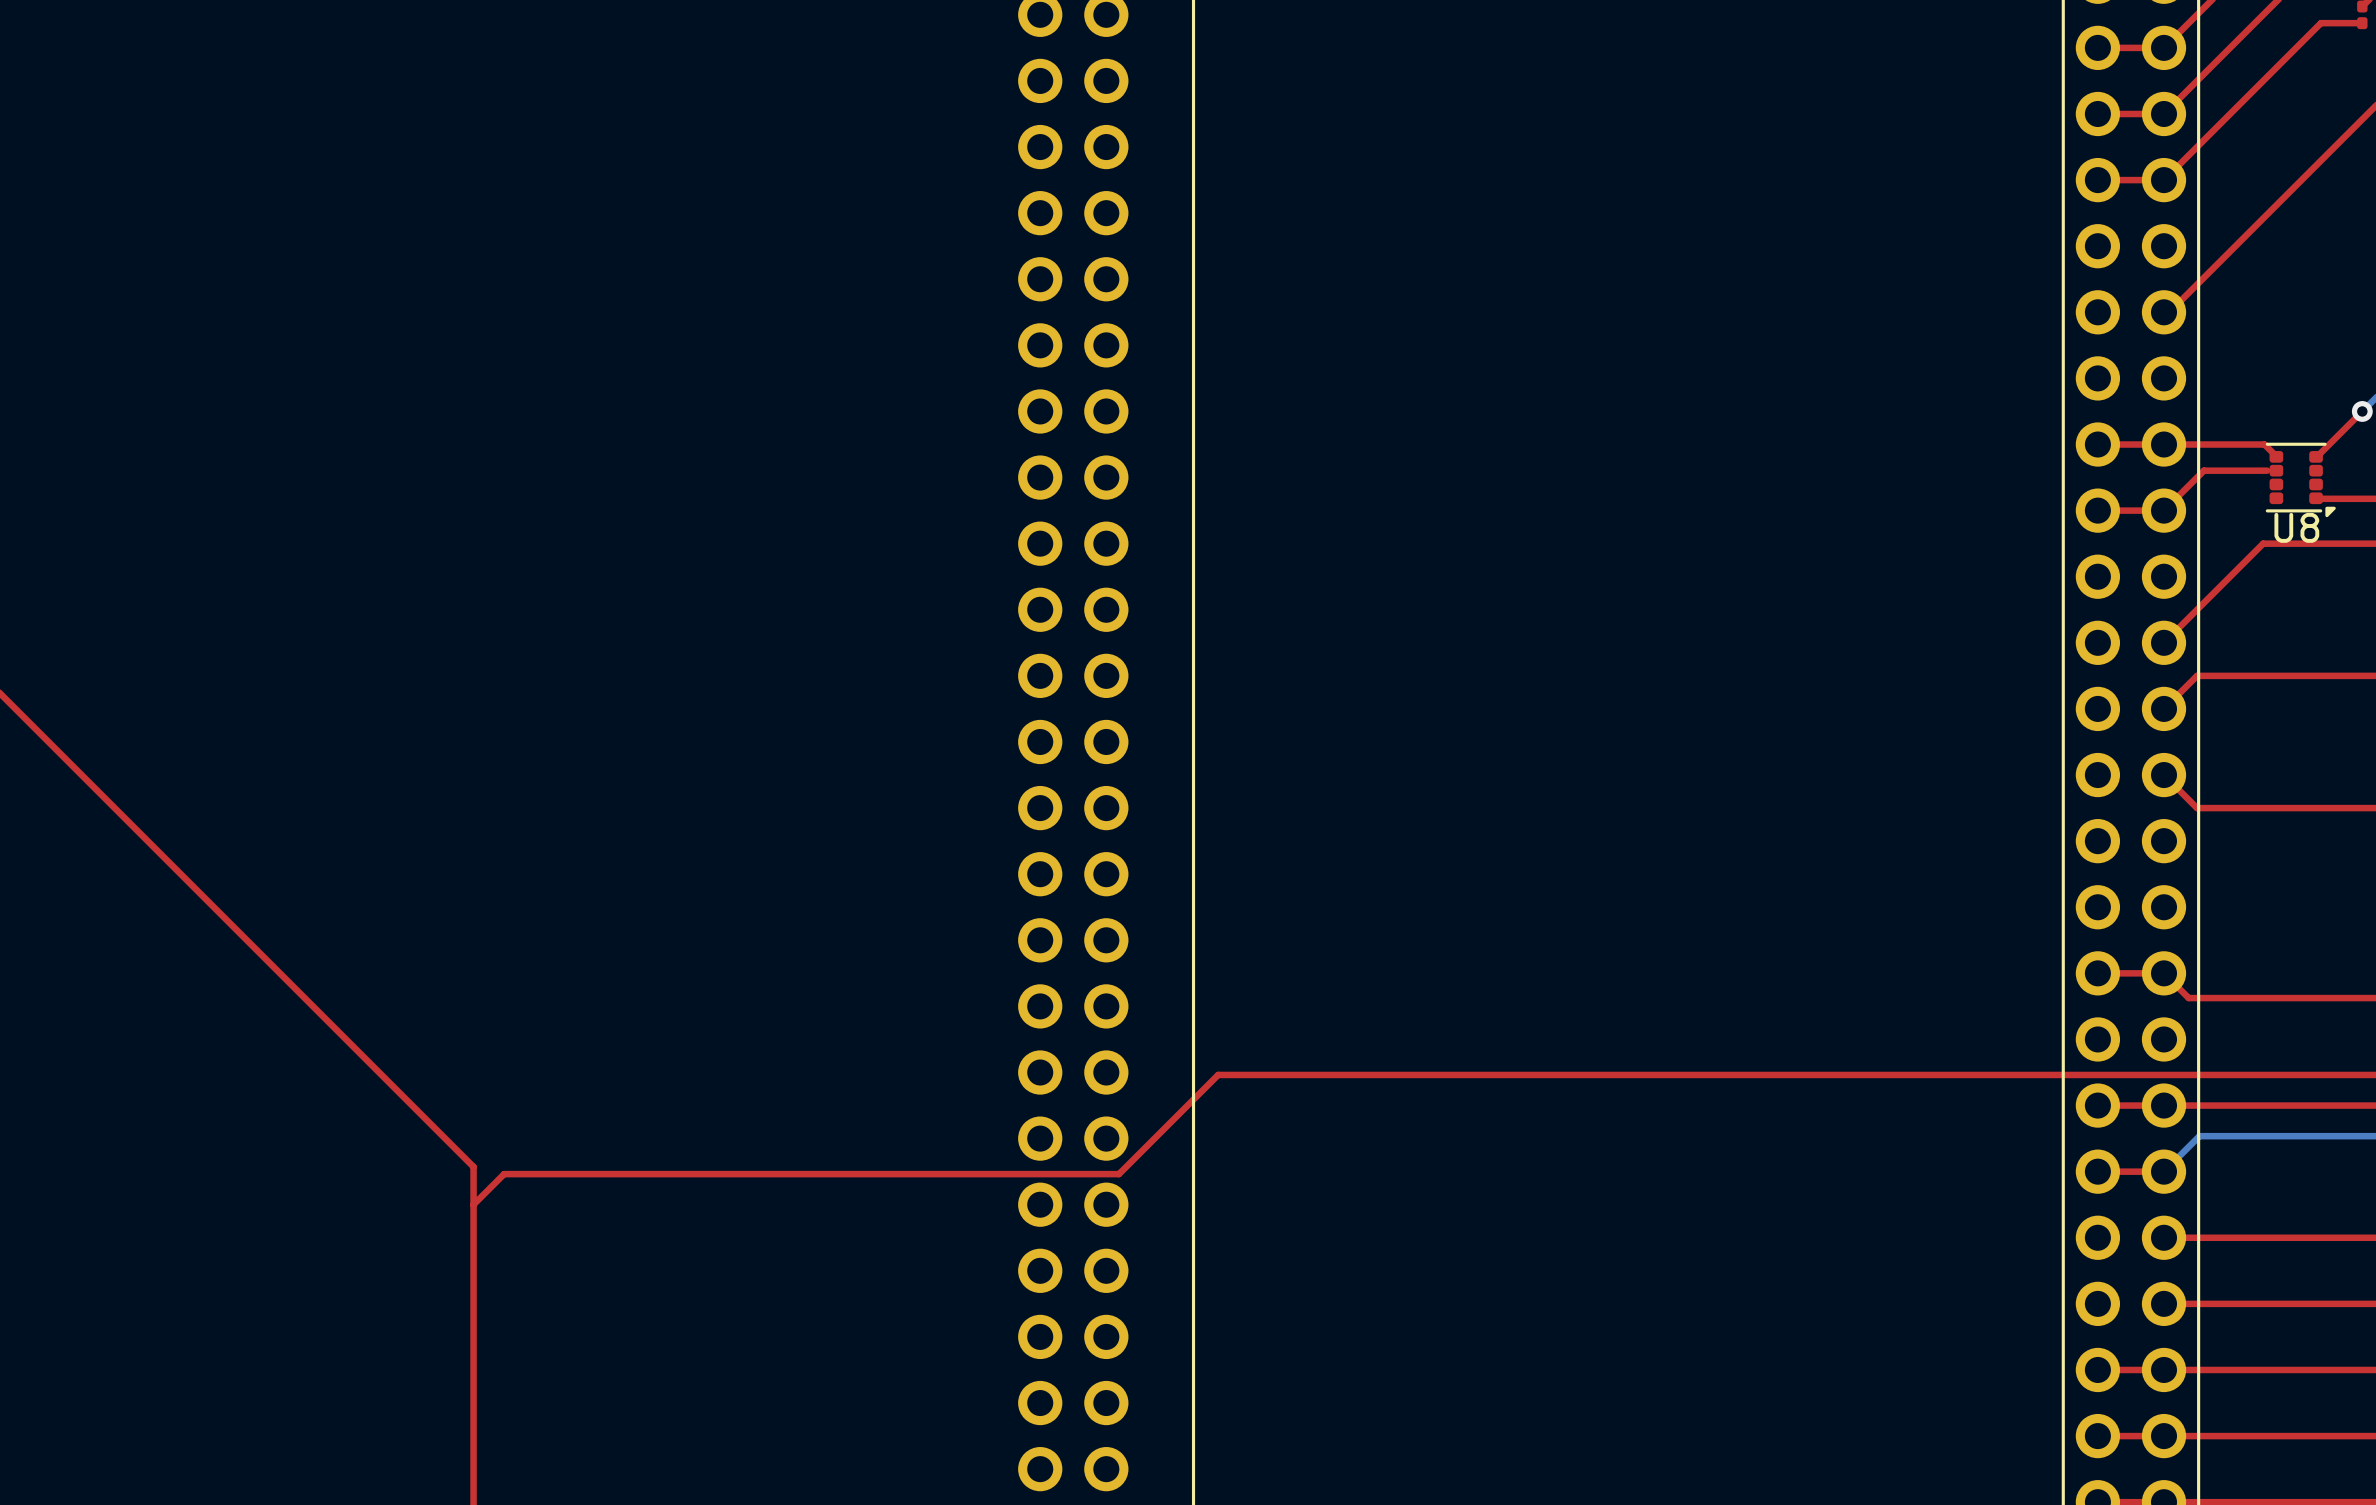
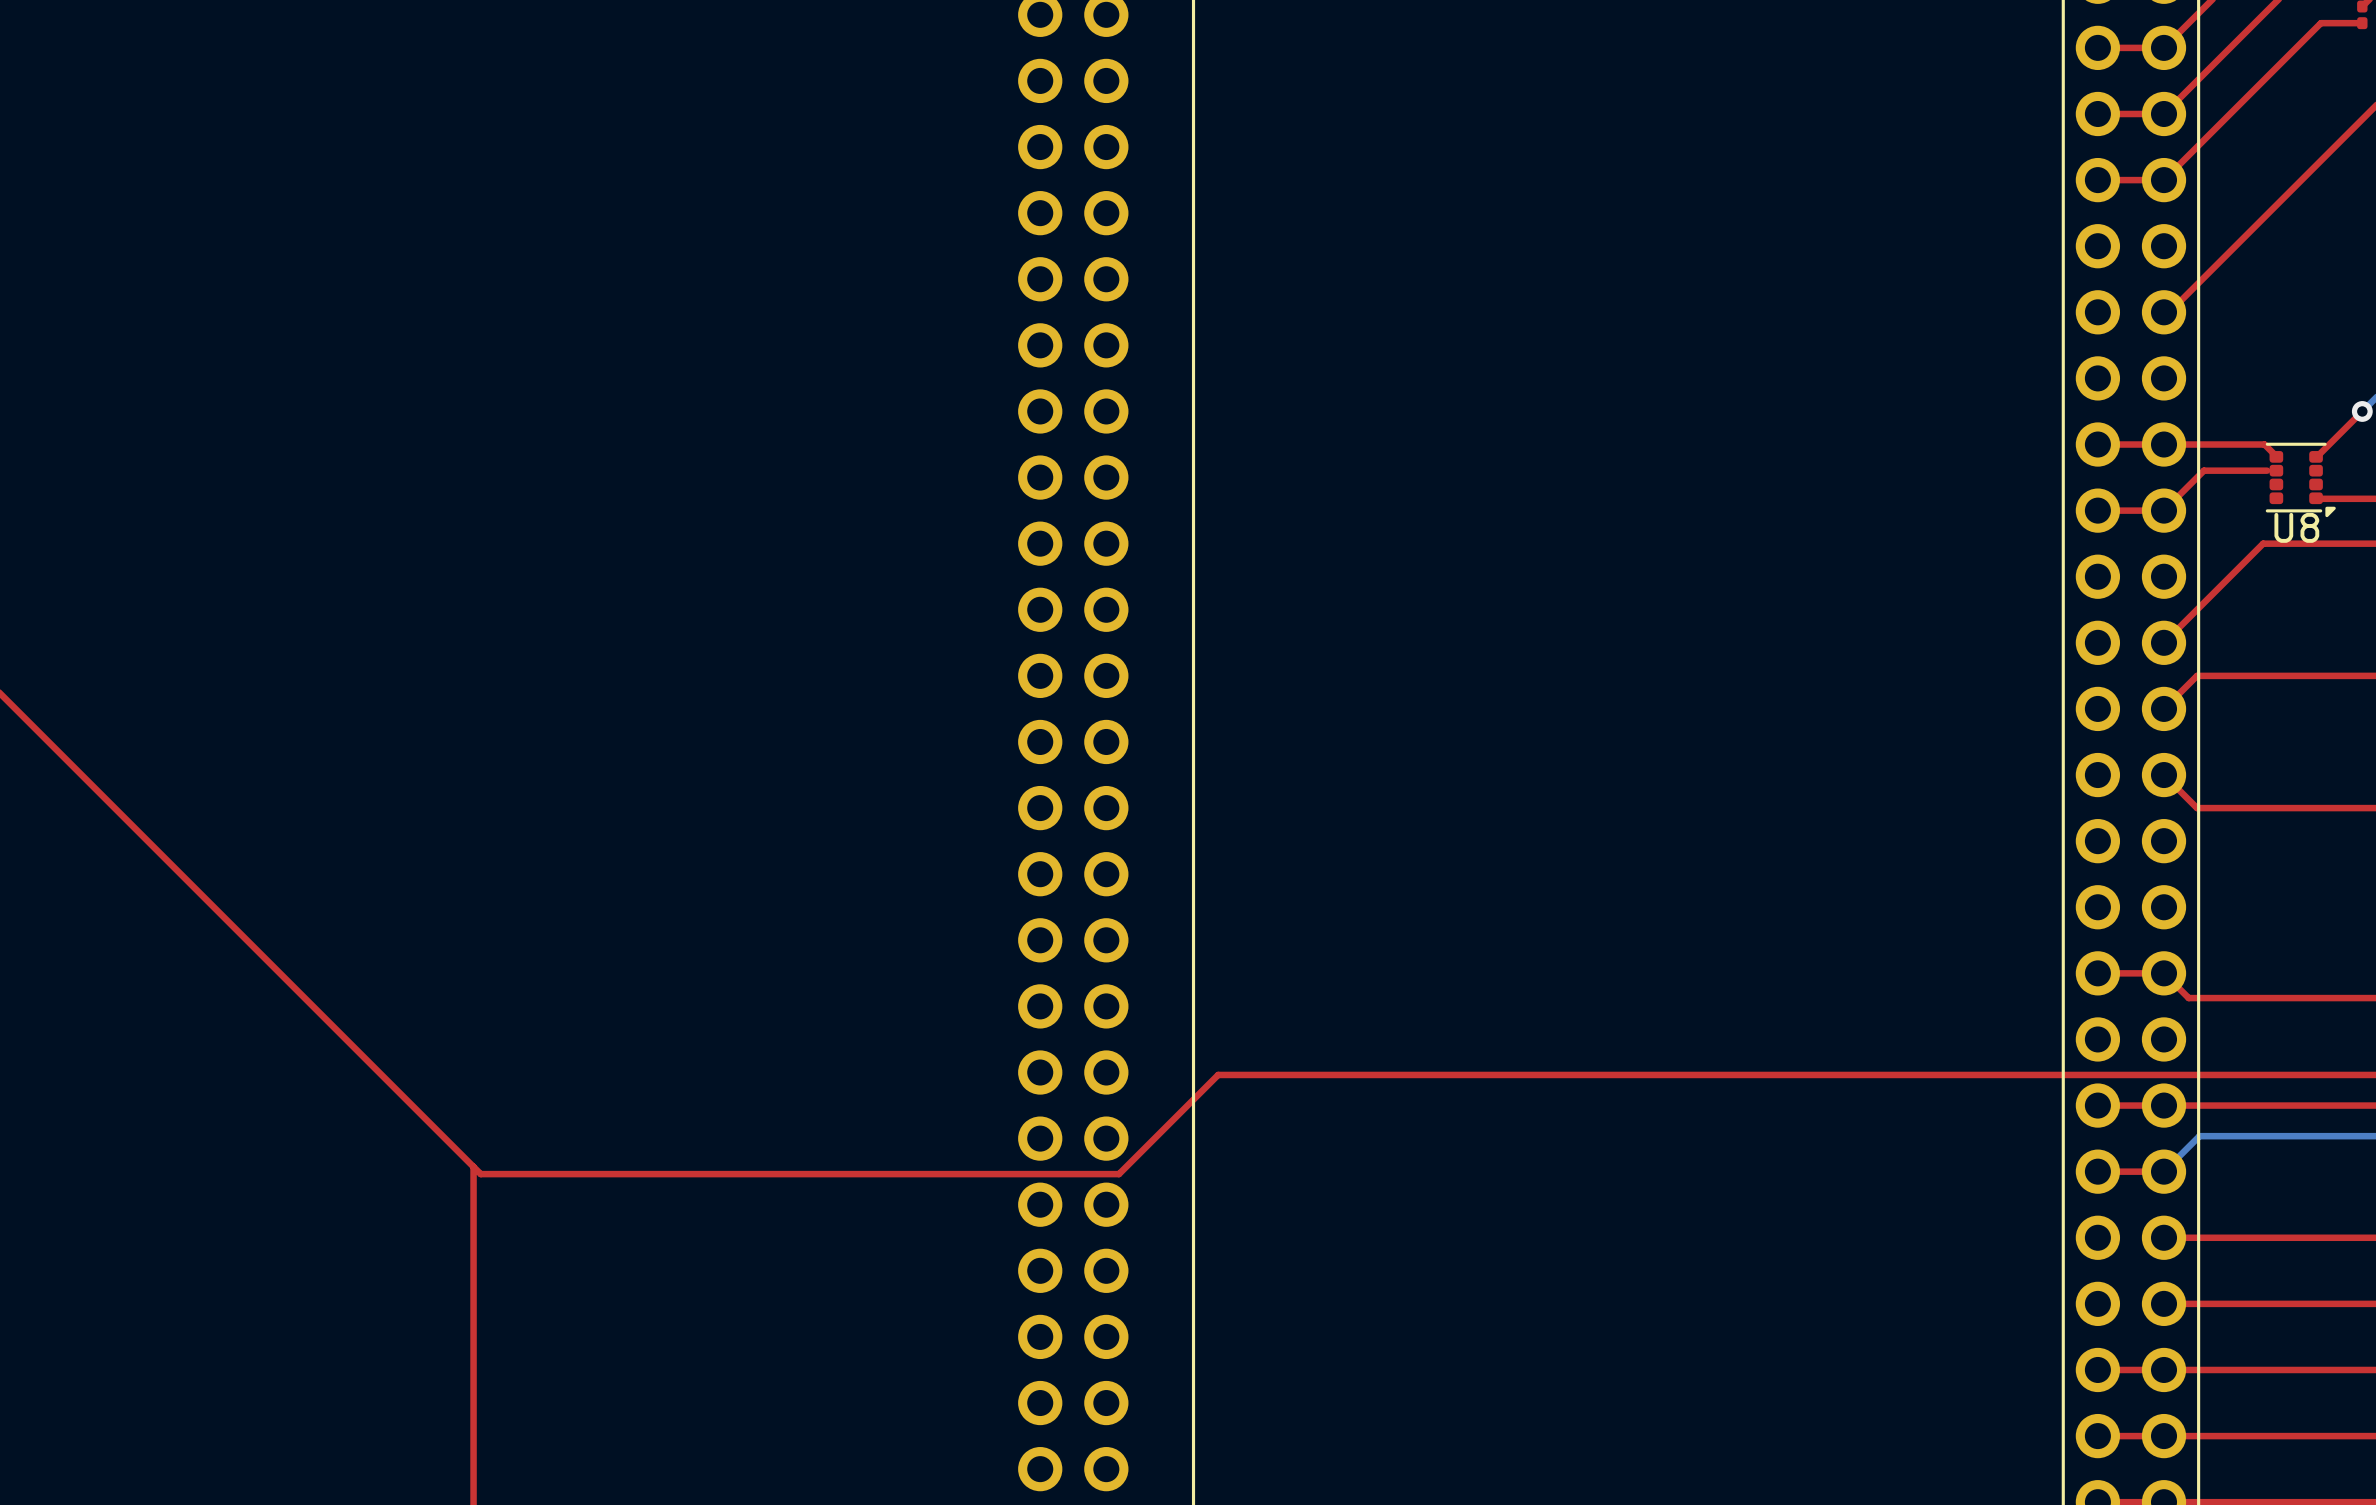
top track: (504, 1174) (473, 1204) -> (504, 1174) (480, 1174) (473, 1166)

